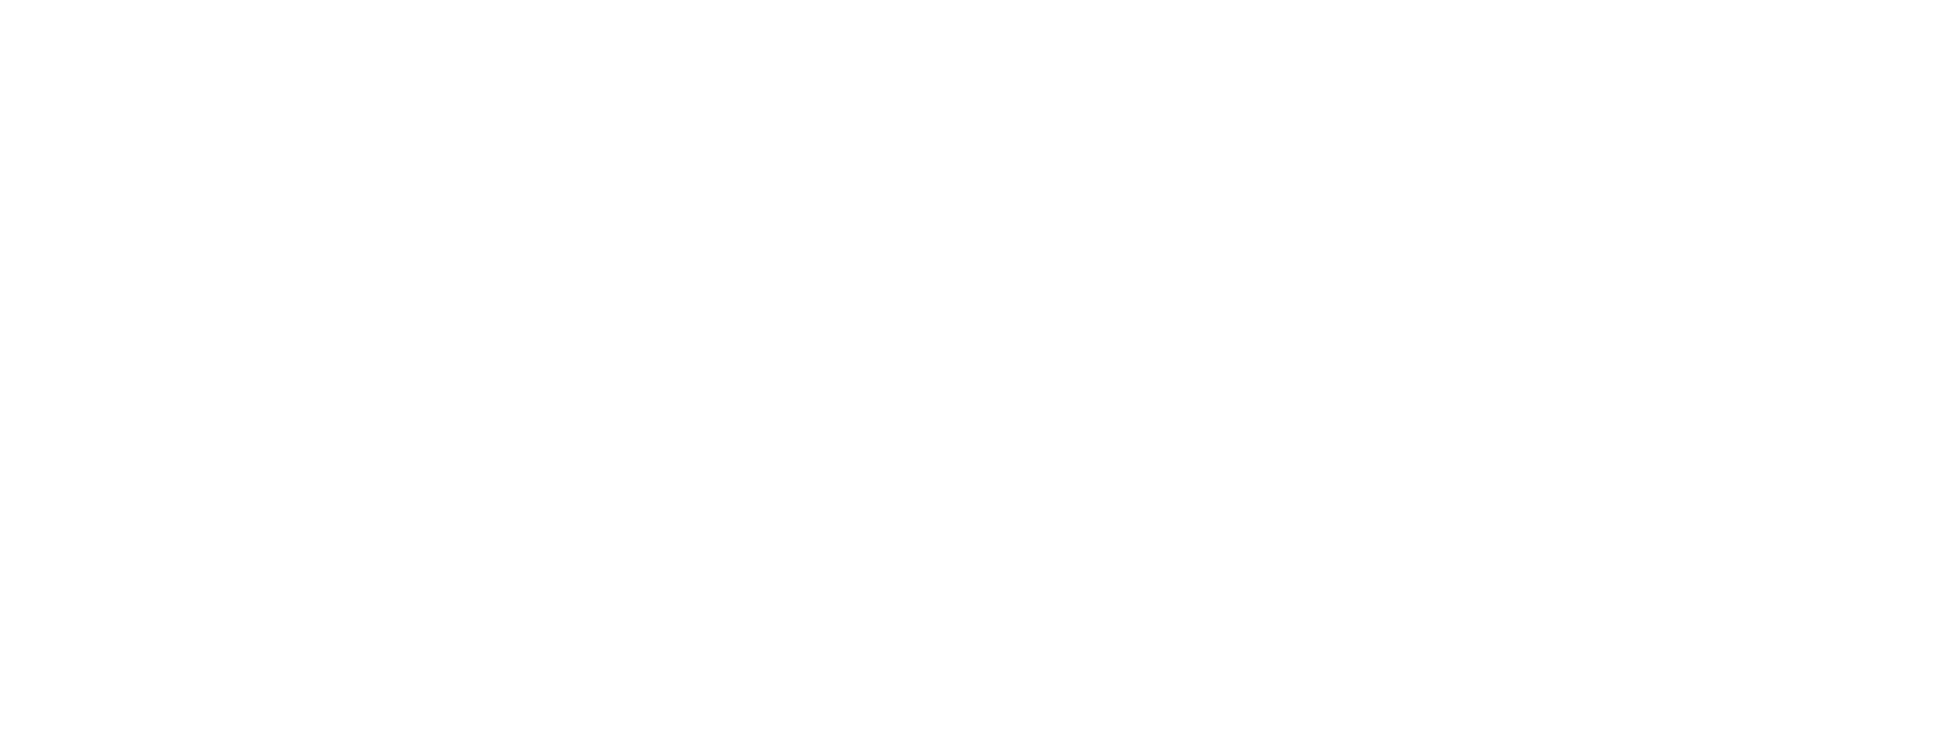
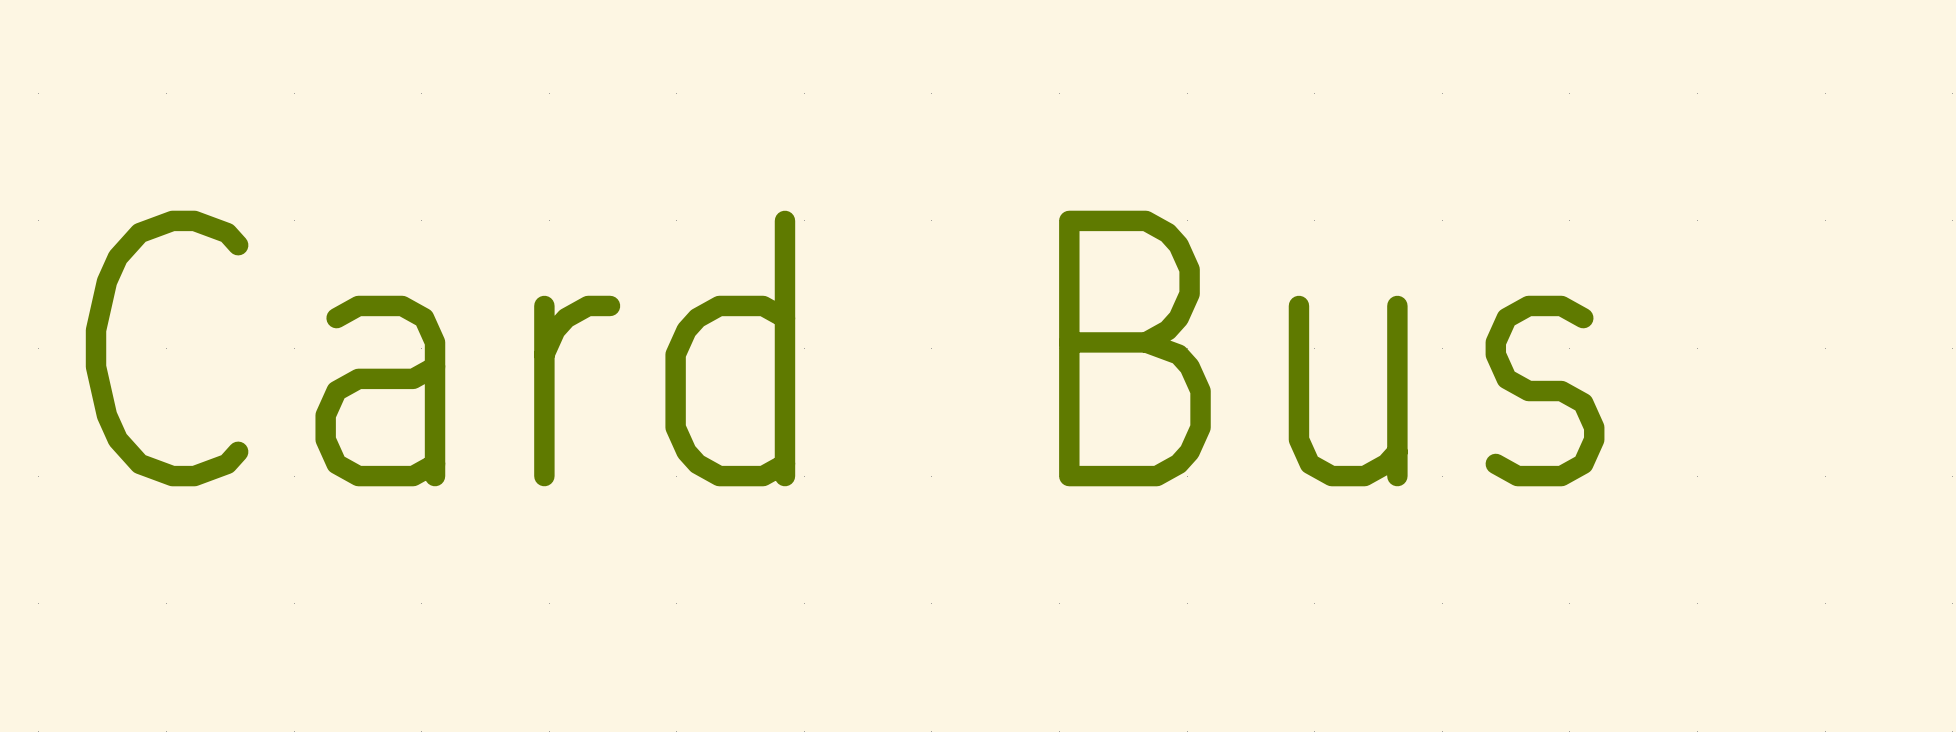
text: none -> Card Bus (845, 348)

